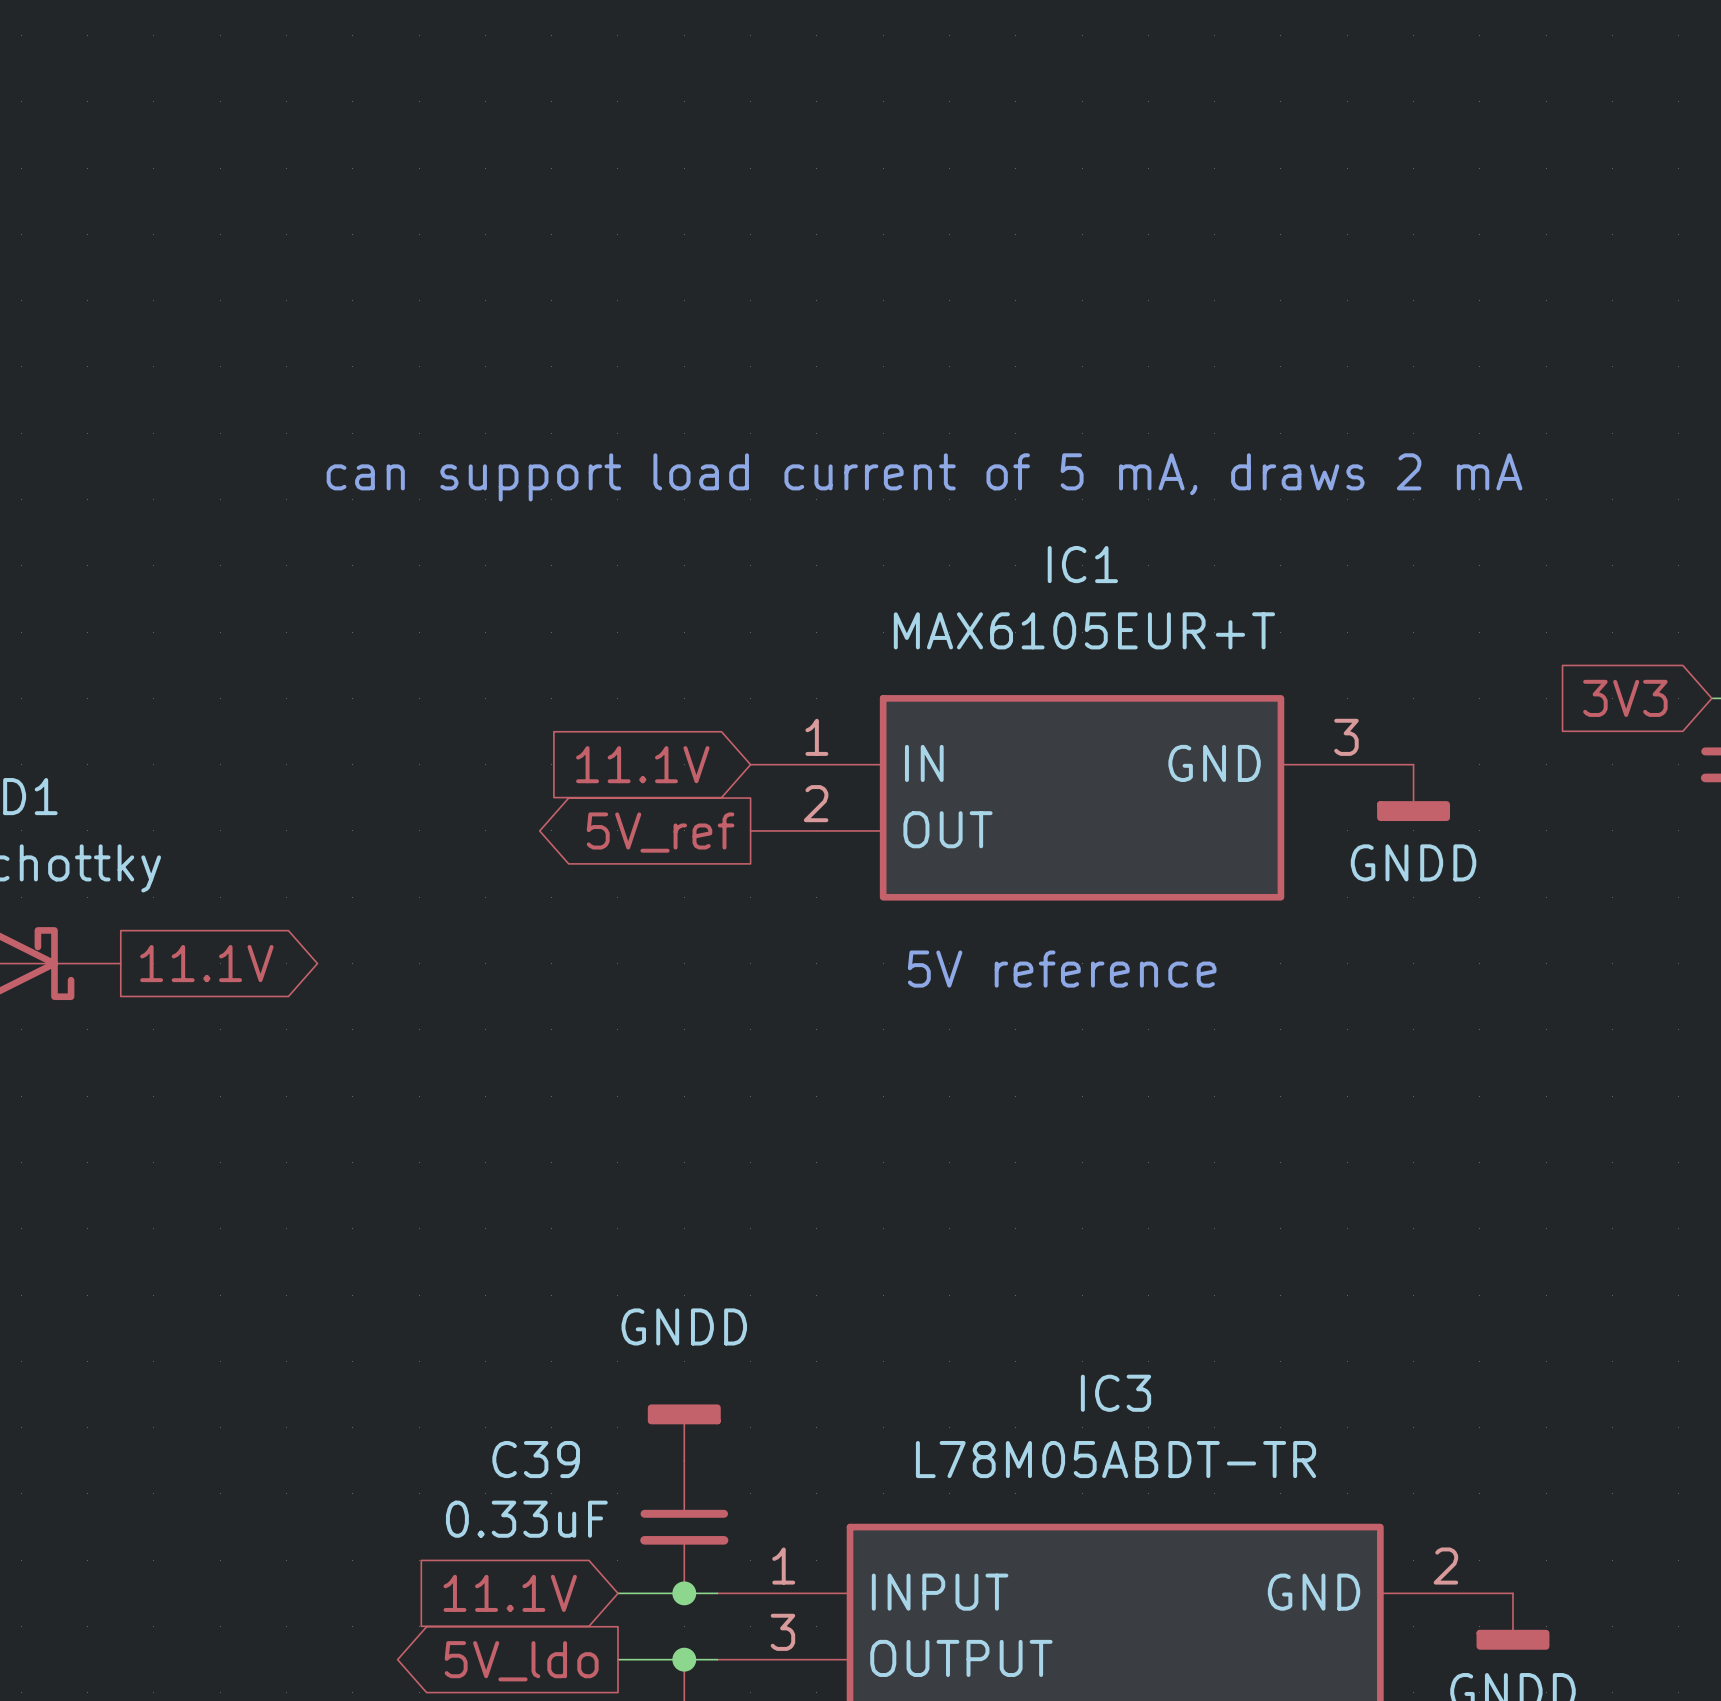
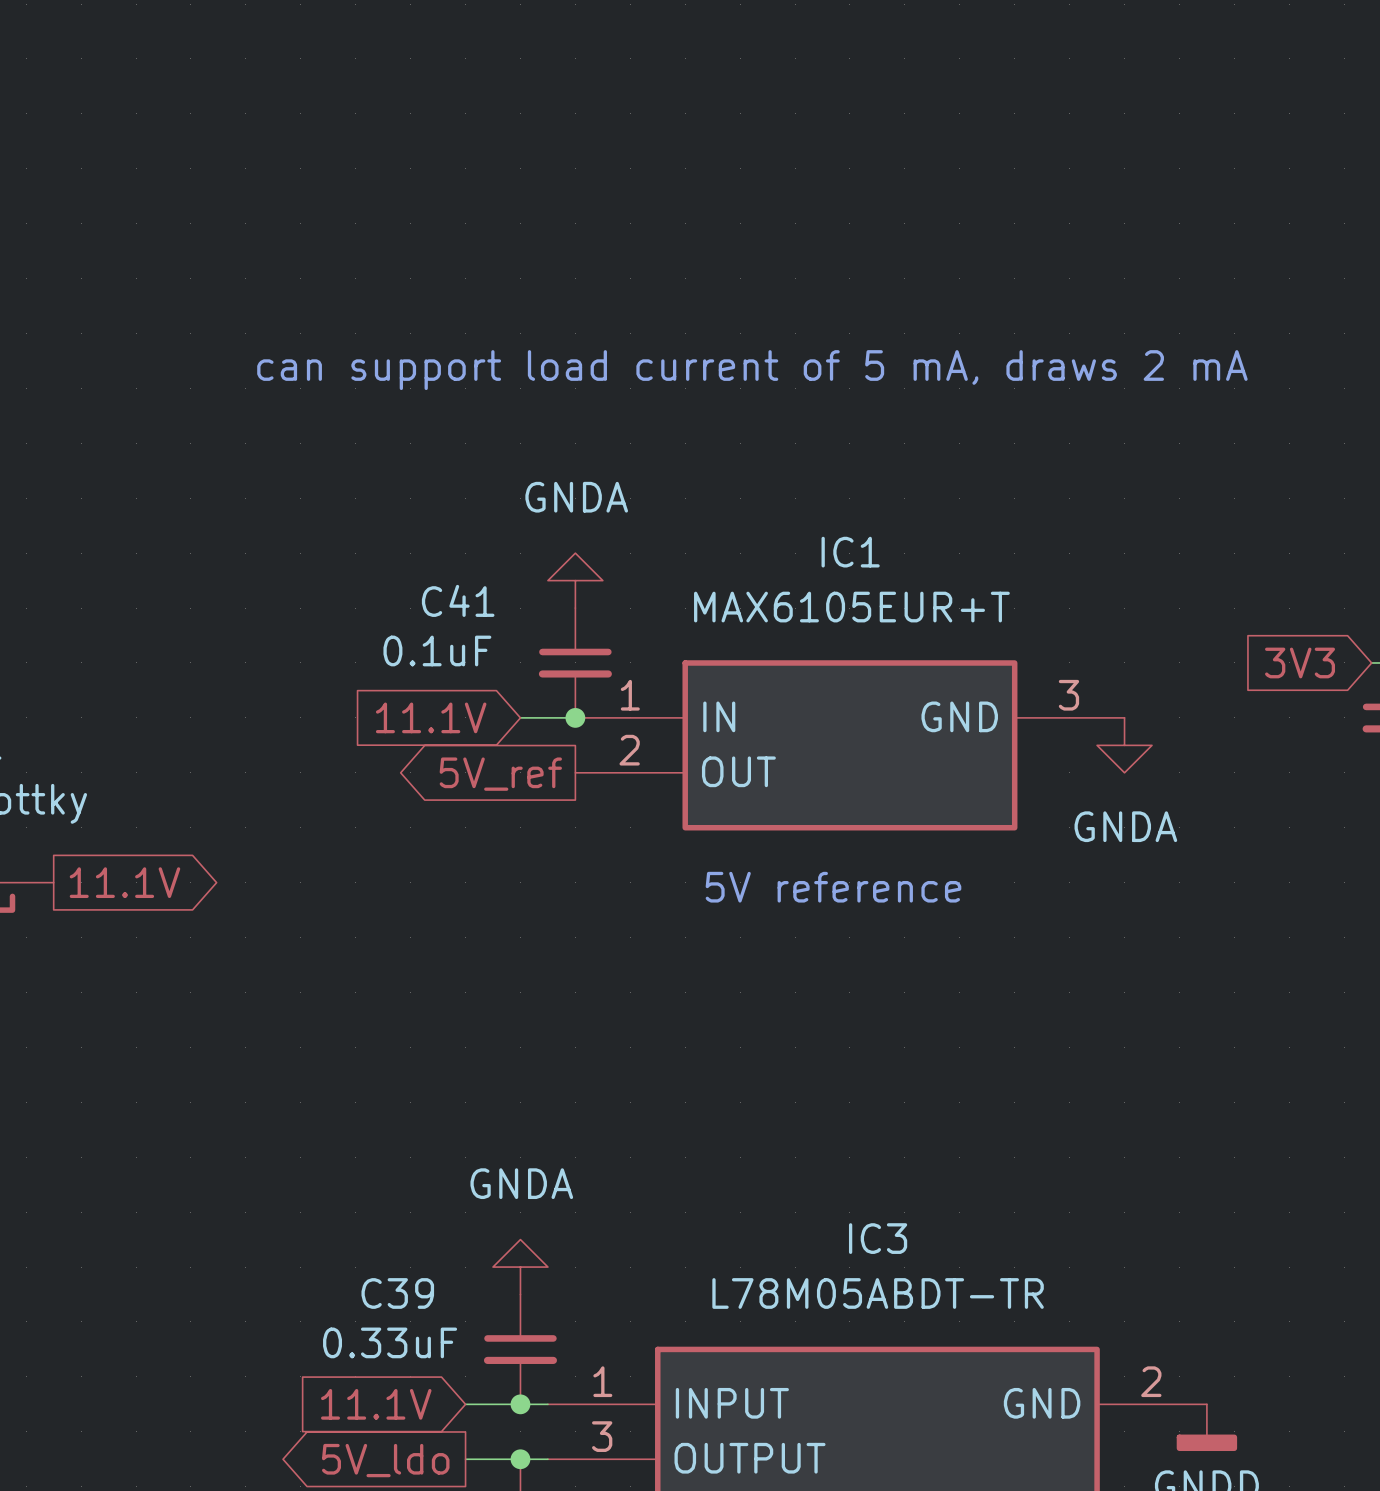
text position: can support load current of 5 mA, draws 2 mA (924, 477) -> can support load current of 5 mA, draws 2 mA (752, 370)
power symbol: none -> GNDA (575, 580)
C41: none -> 0.1uF (575, 662)
global label position: 11.1V (642, 764) -> 11.1V (431, 717)
wire: none -> (520, 717) (575, 717)
junction: none -> (575, 717)
power symbol: GNDD (1413, 792) -> GNDA (1124, 745)
power symbol: GNDD (684, 1432) -> GNDA (520, 1267)

